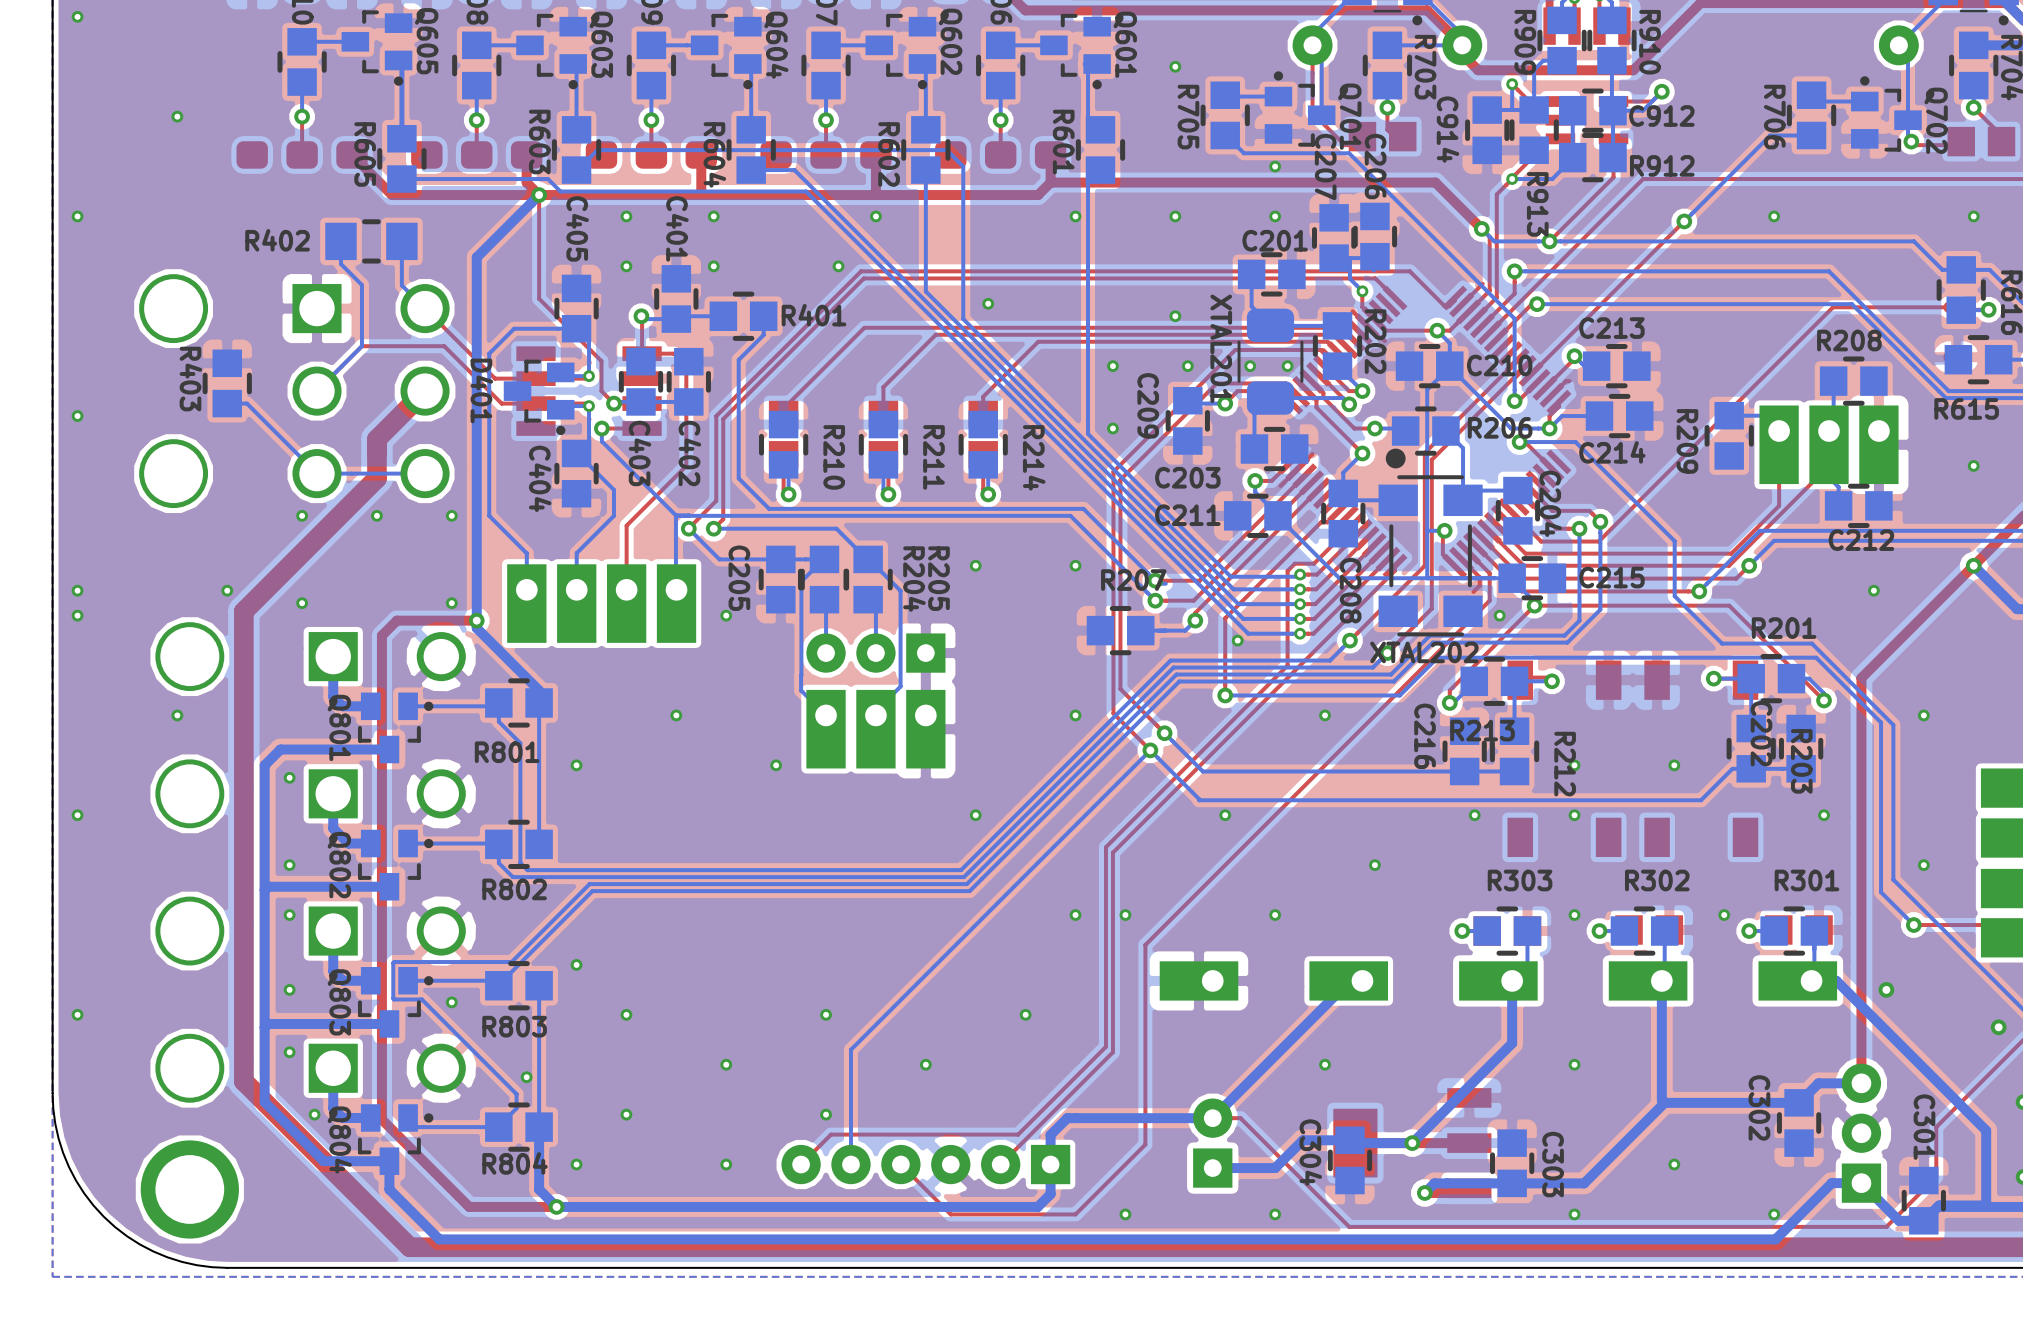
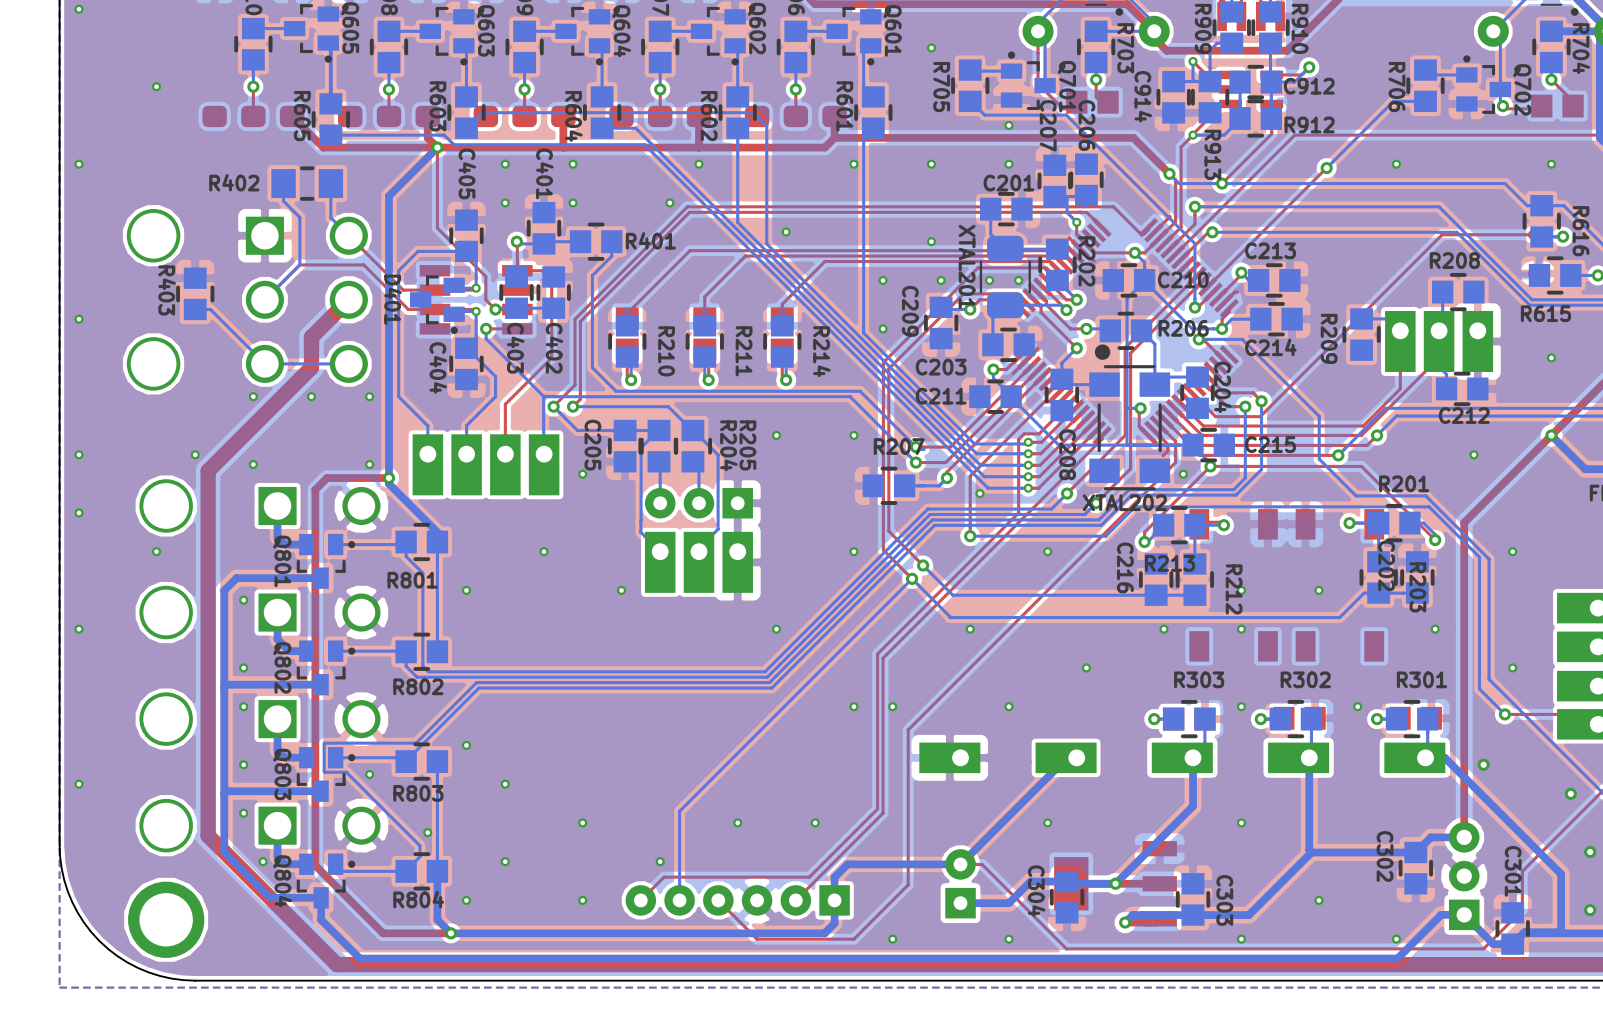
via position: (77, 615) -> (79, 512)
via: (826, 1014) -> none
via position: (1025, 1014) -> (815, 822)

